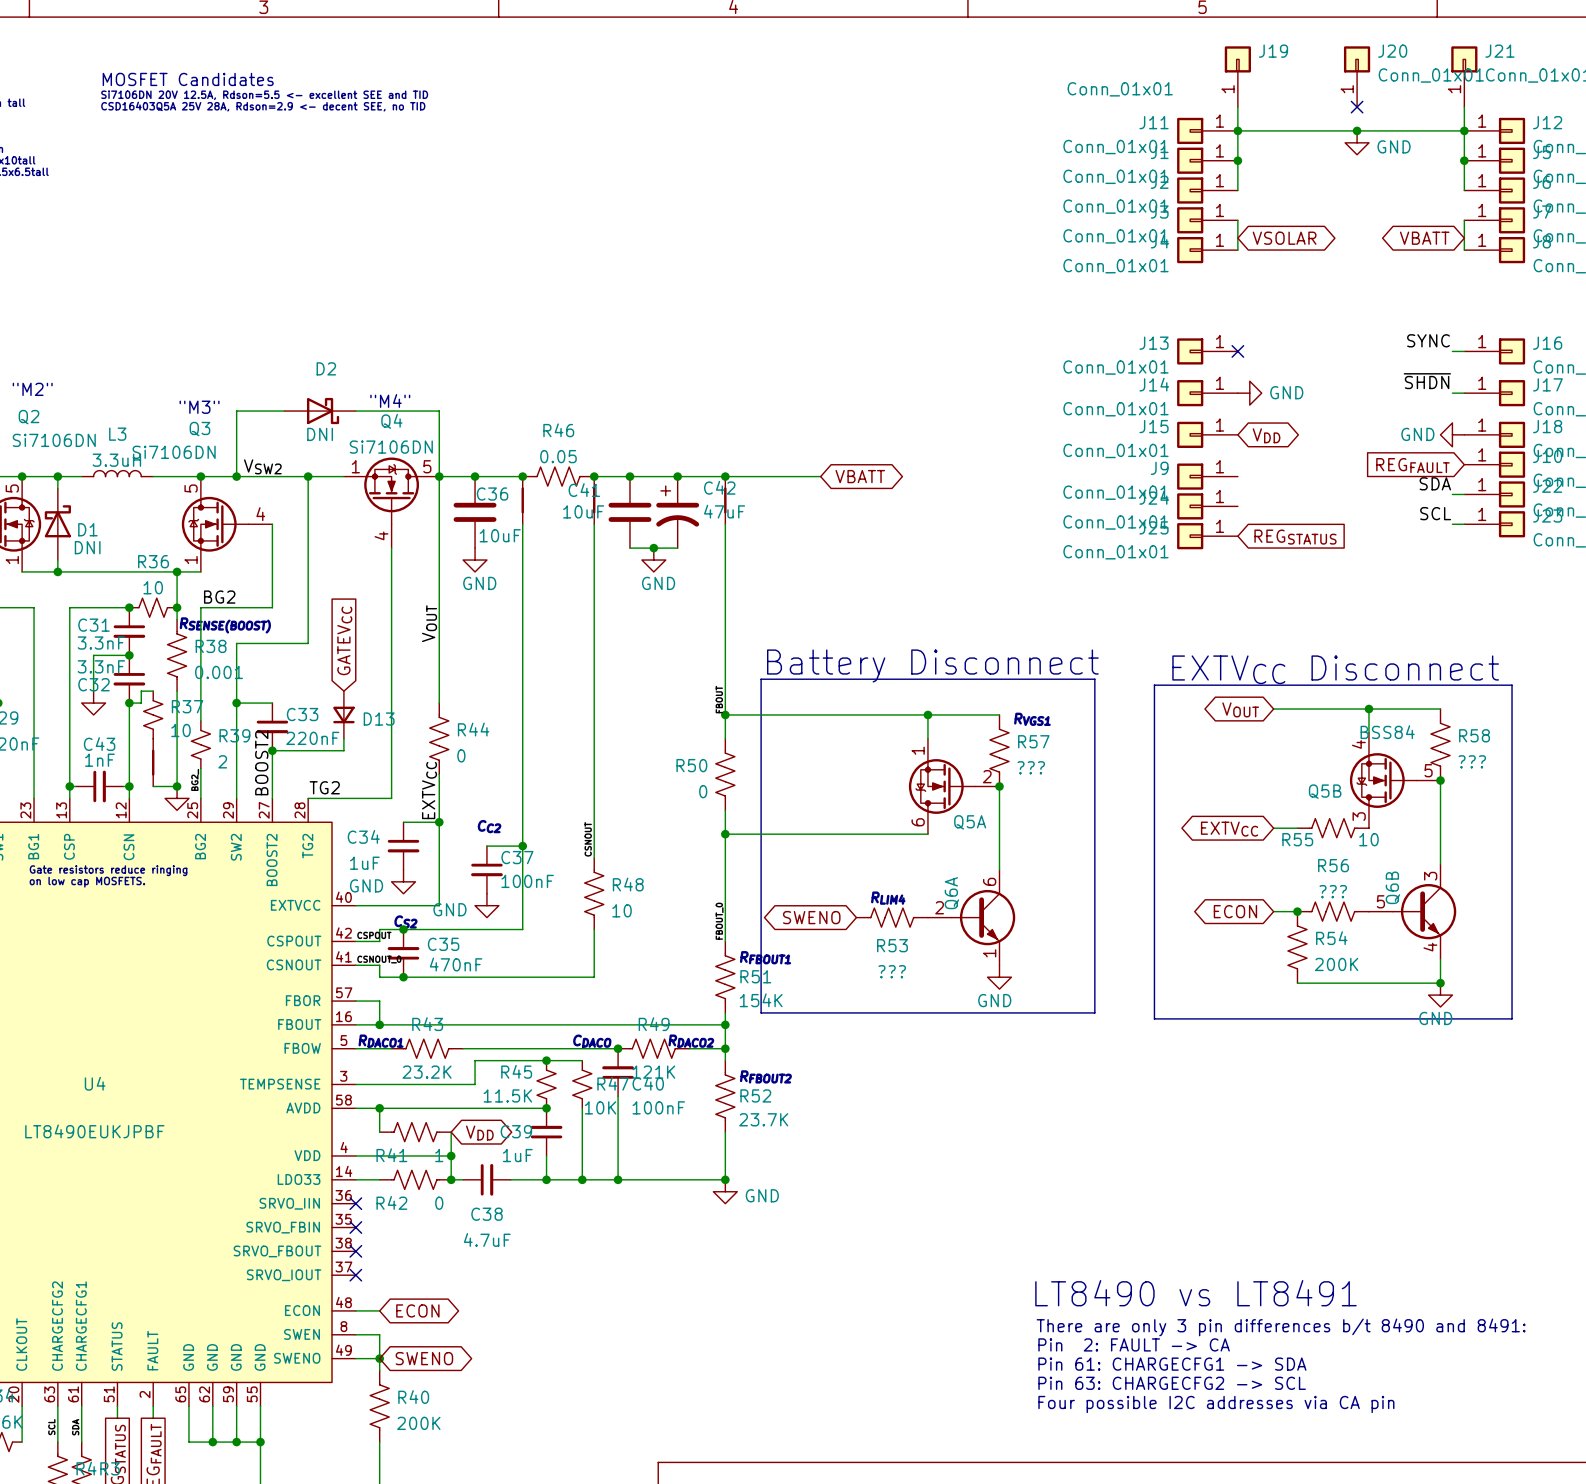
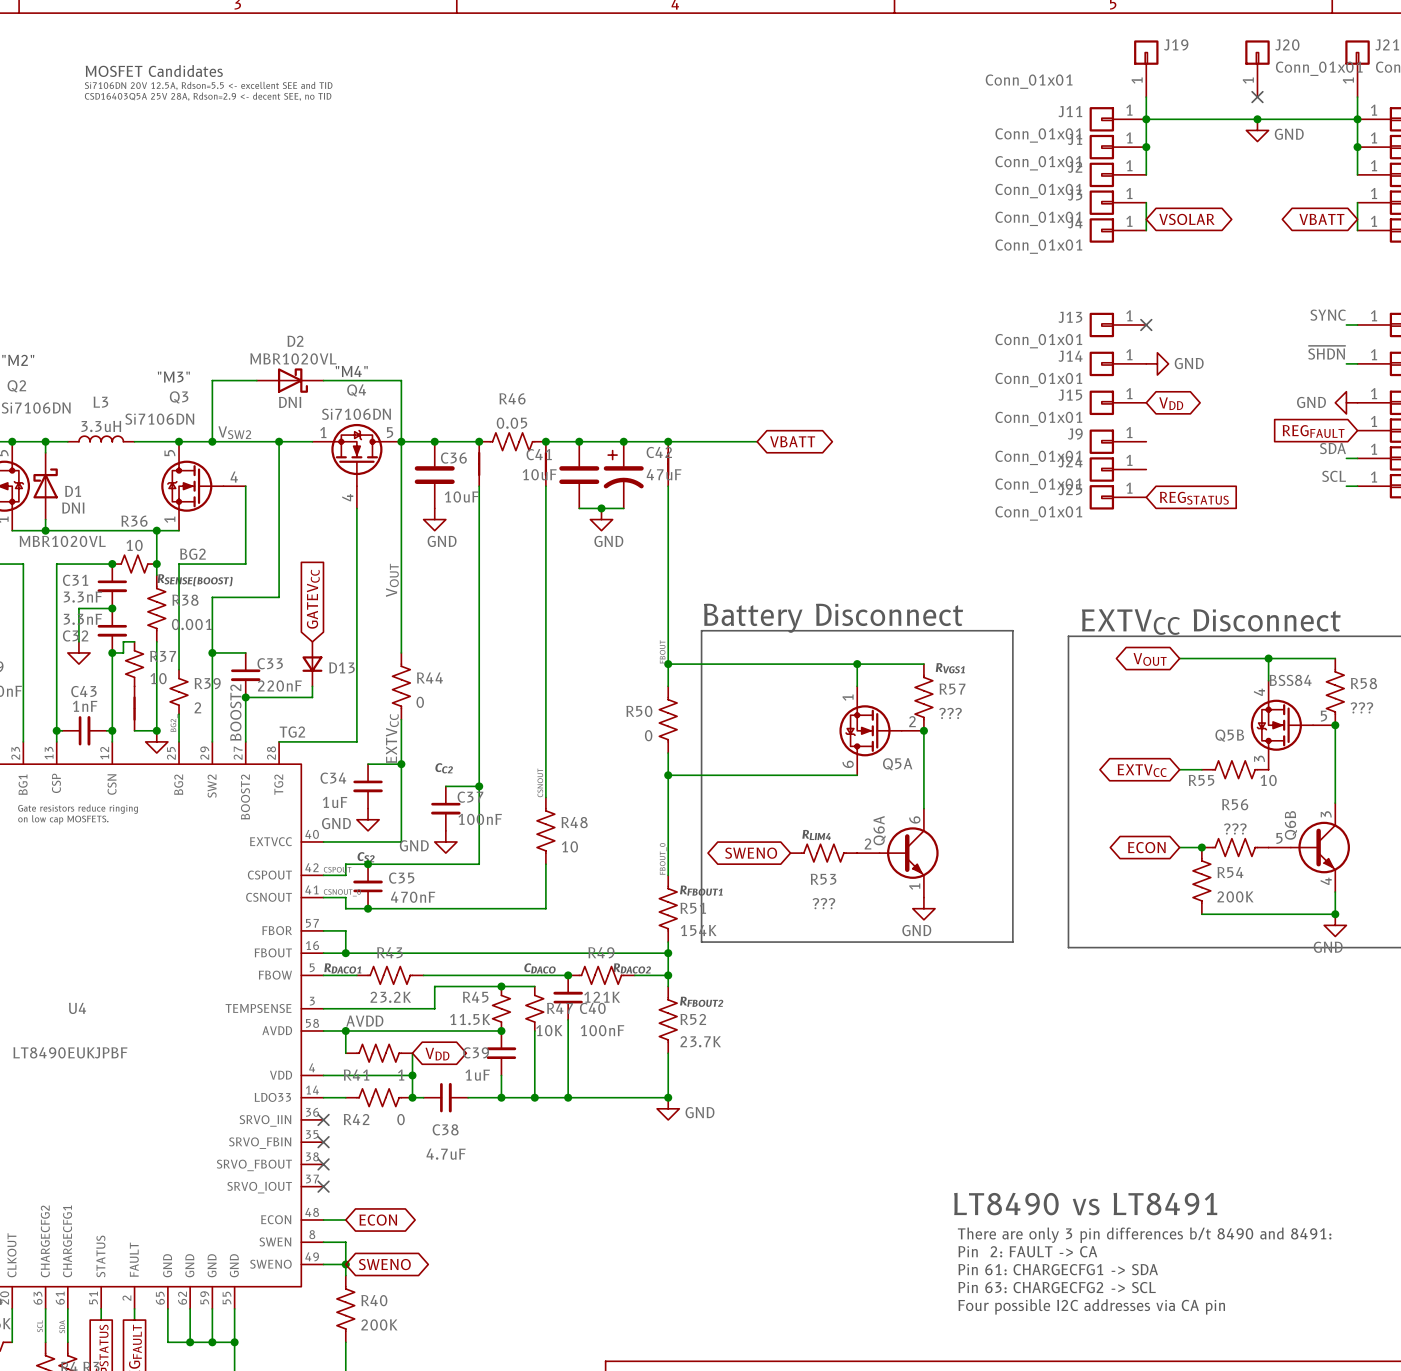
D2 value: none -> MBR1020VL (293, 358)
D1 value: none -> MBR1020VL (62, 541)
label: none -> AVDD (364, 1021)

